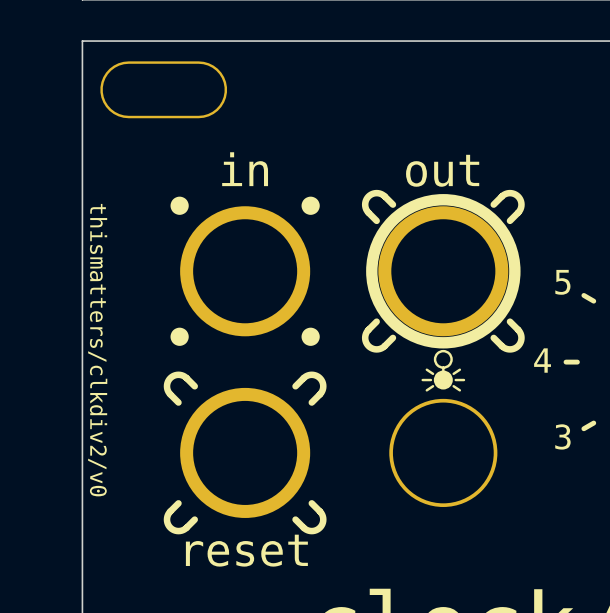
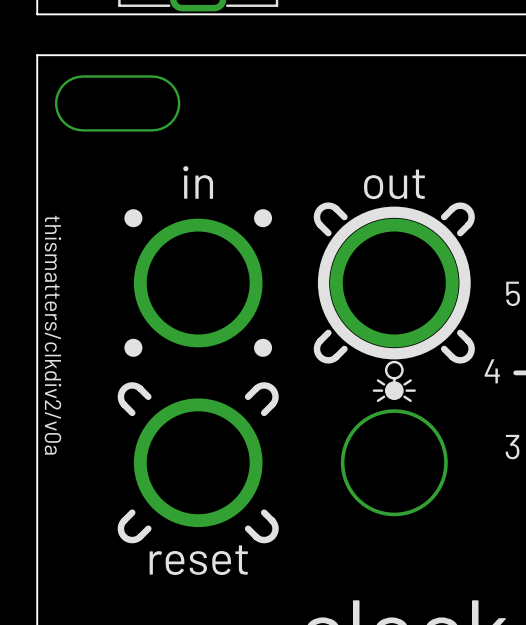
text: thismatters/clkdiv2/v0 (97, 350) -> thismatters/clkdiv2/v0a (52, 335)

